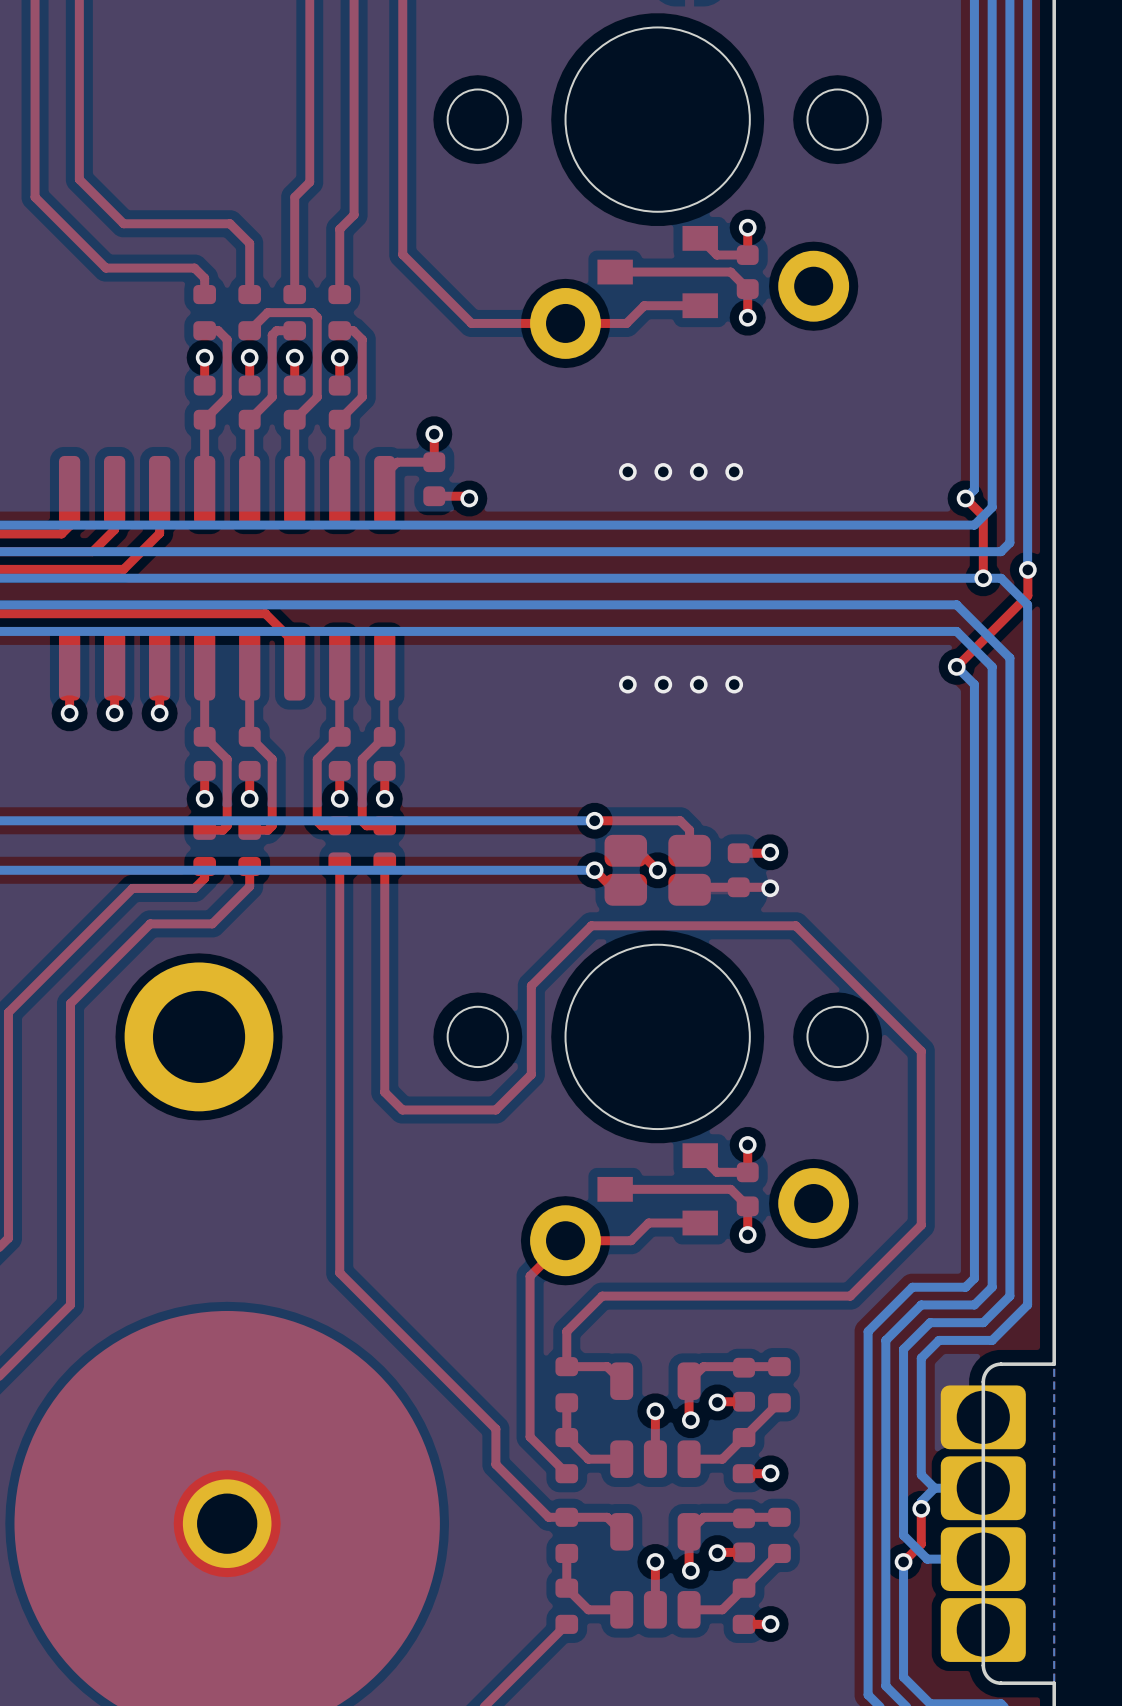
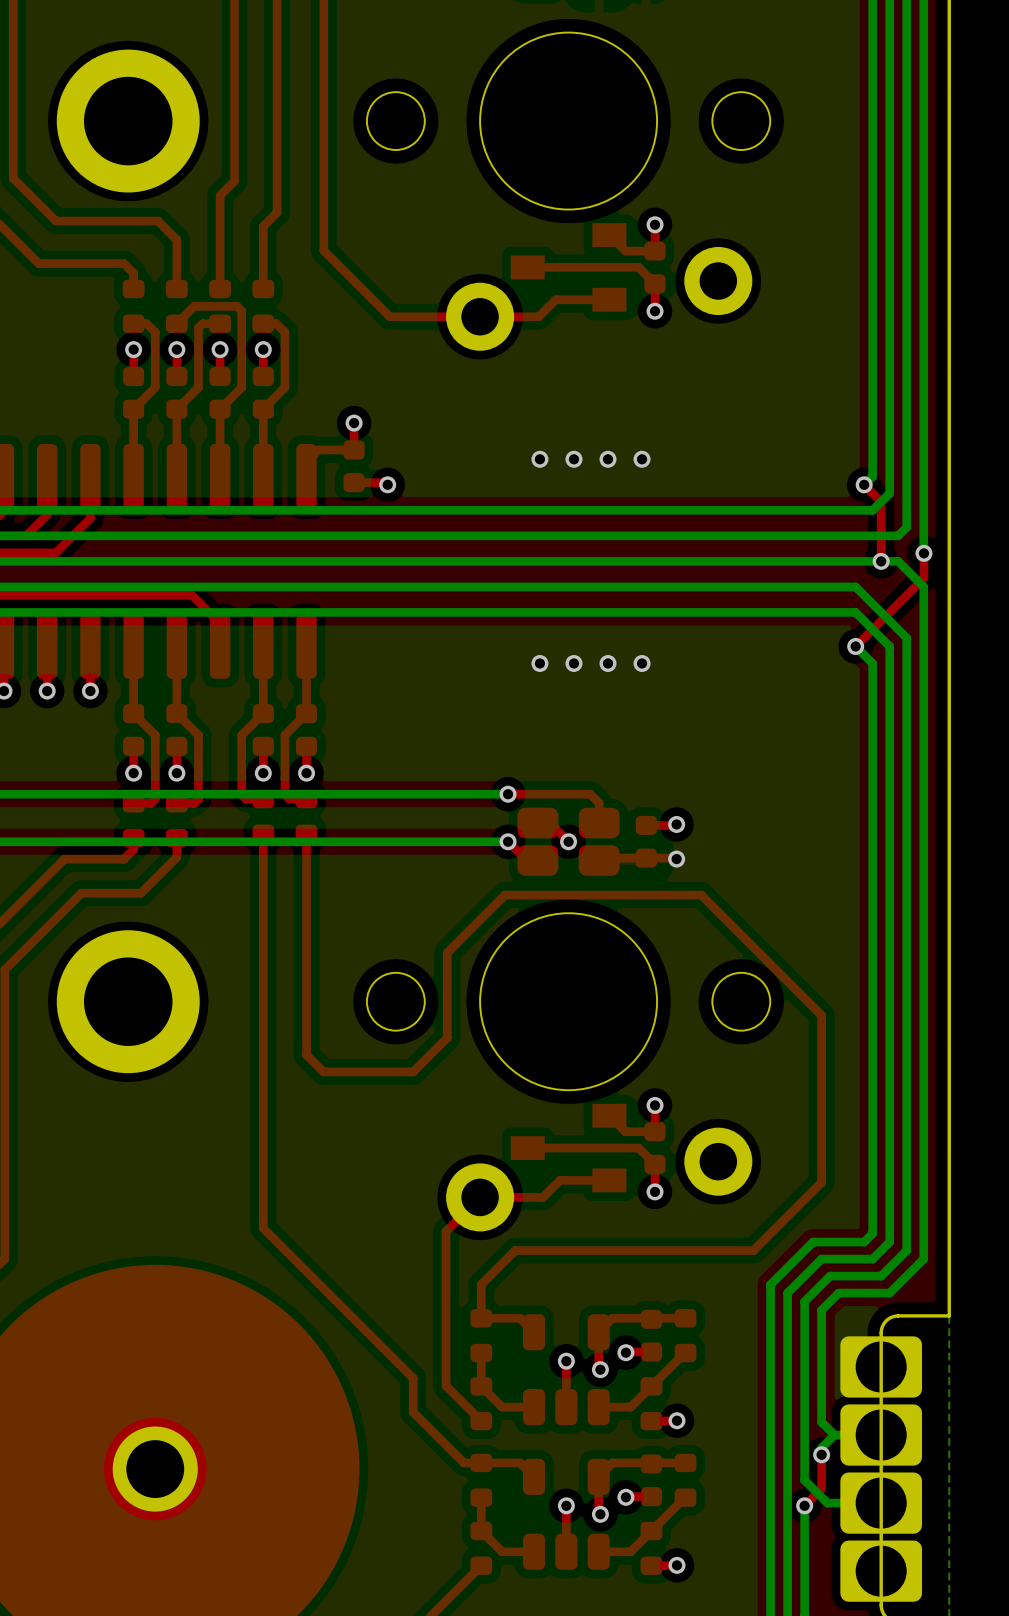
part: none -> (128, 121)

